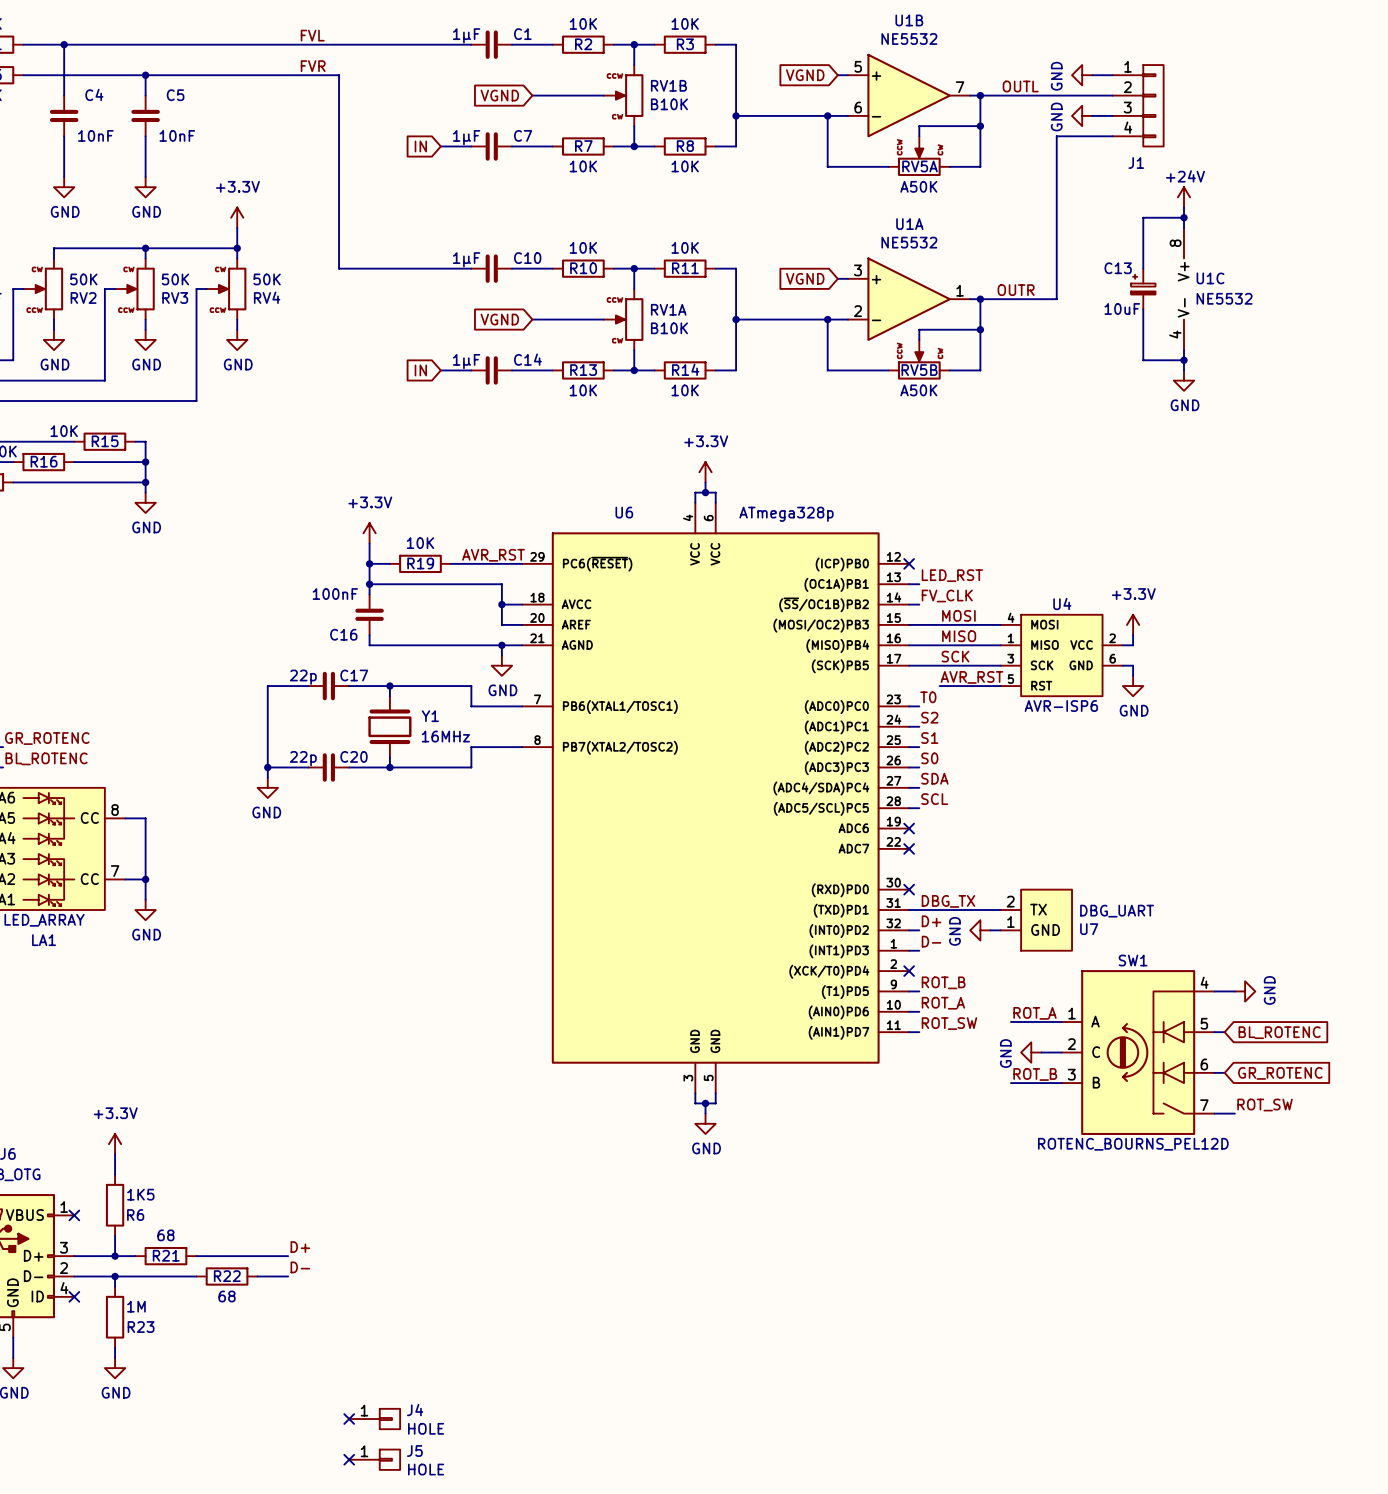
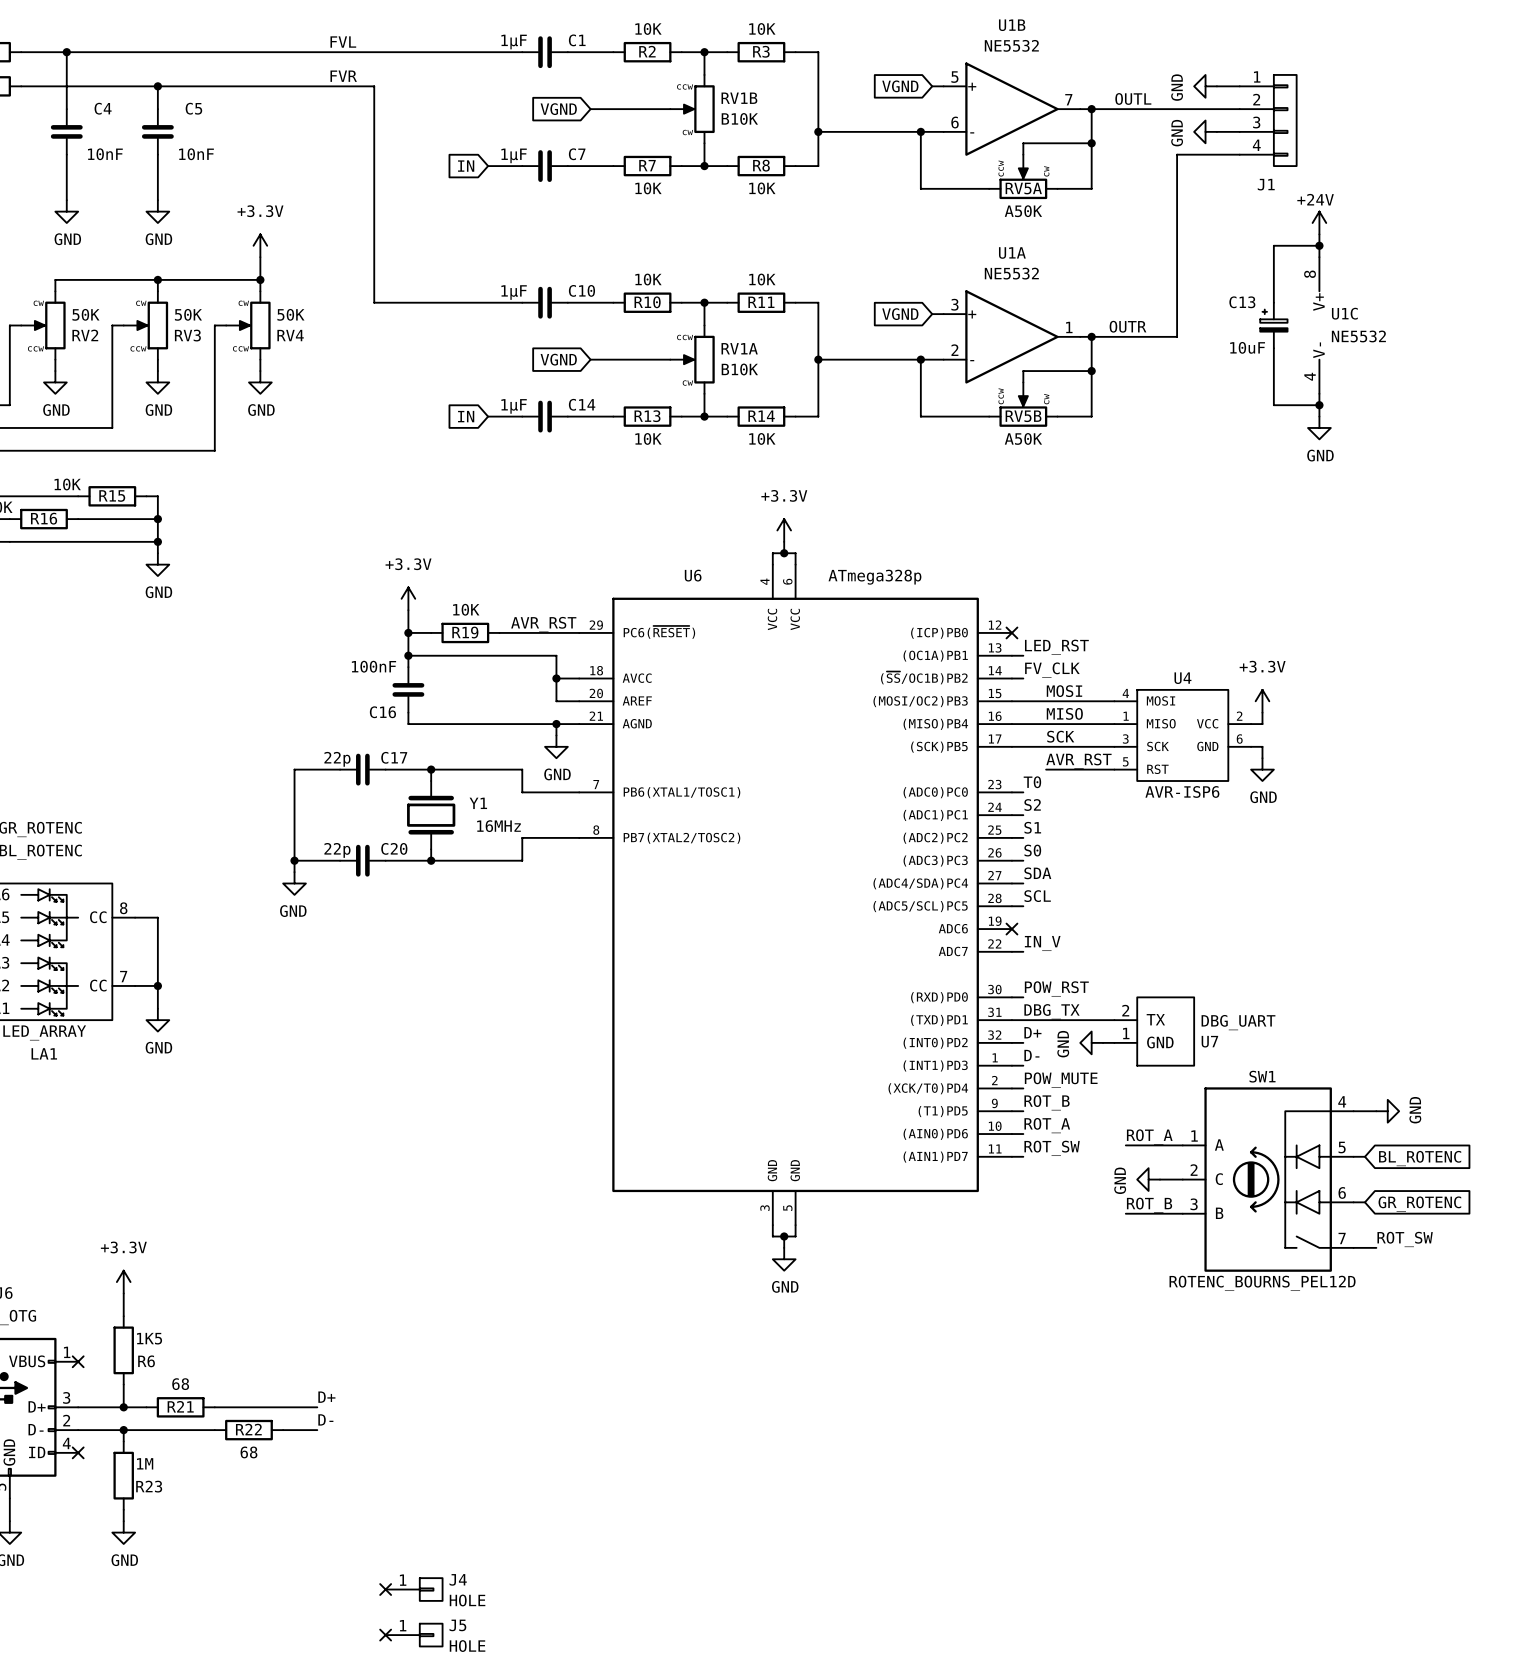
label: none -> IN_V (1042, 943)
wire: none -> (1011, 951) (1023, 951)
no-connect mark: (909, 848) -> none
label: none -> POW_RST (1056, 988)
wire: none -> (1011, 997) (1023, 997)
no-connect mark: (909, 889) -> none
label: none -> POW_MUTE (1061, 1080)
wire: none -> (1011, 1088) (1023, 1088)
no-connect mark: (909, 971) -> none

